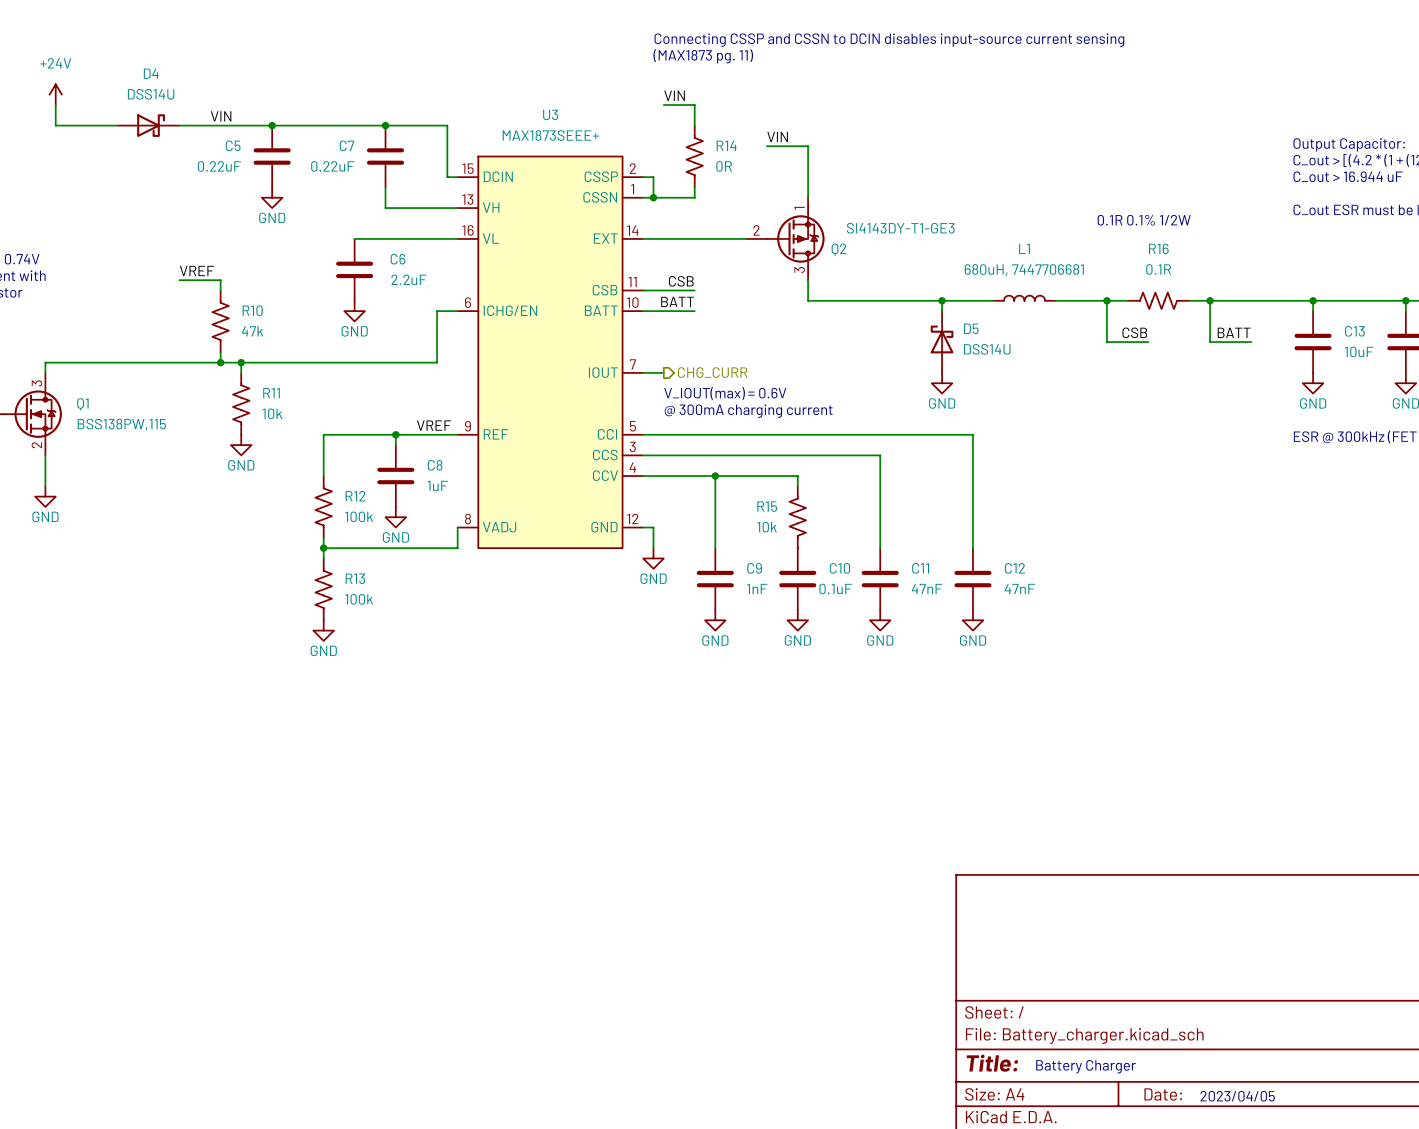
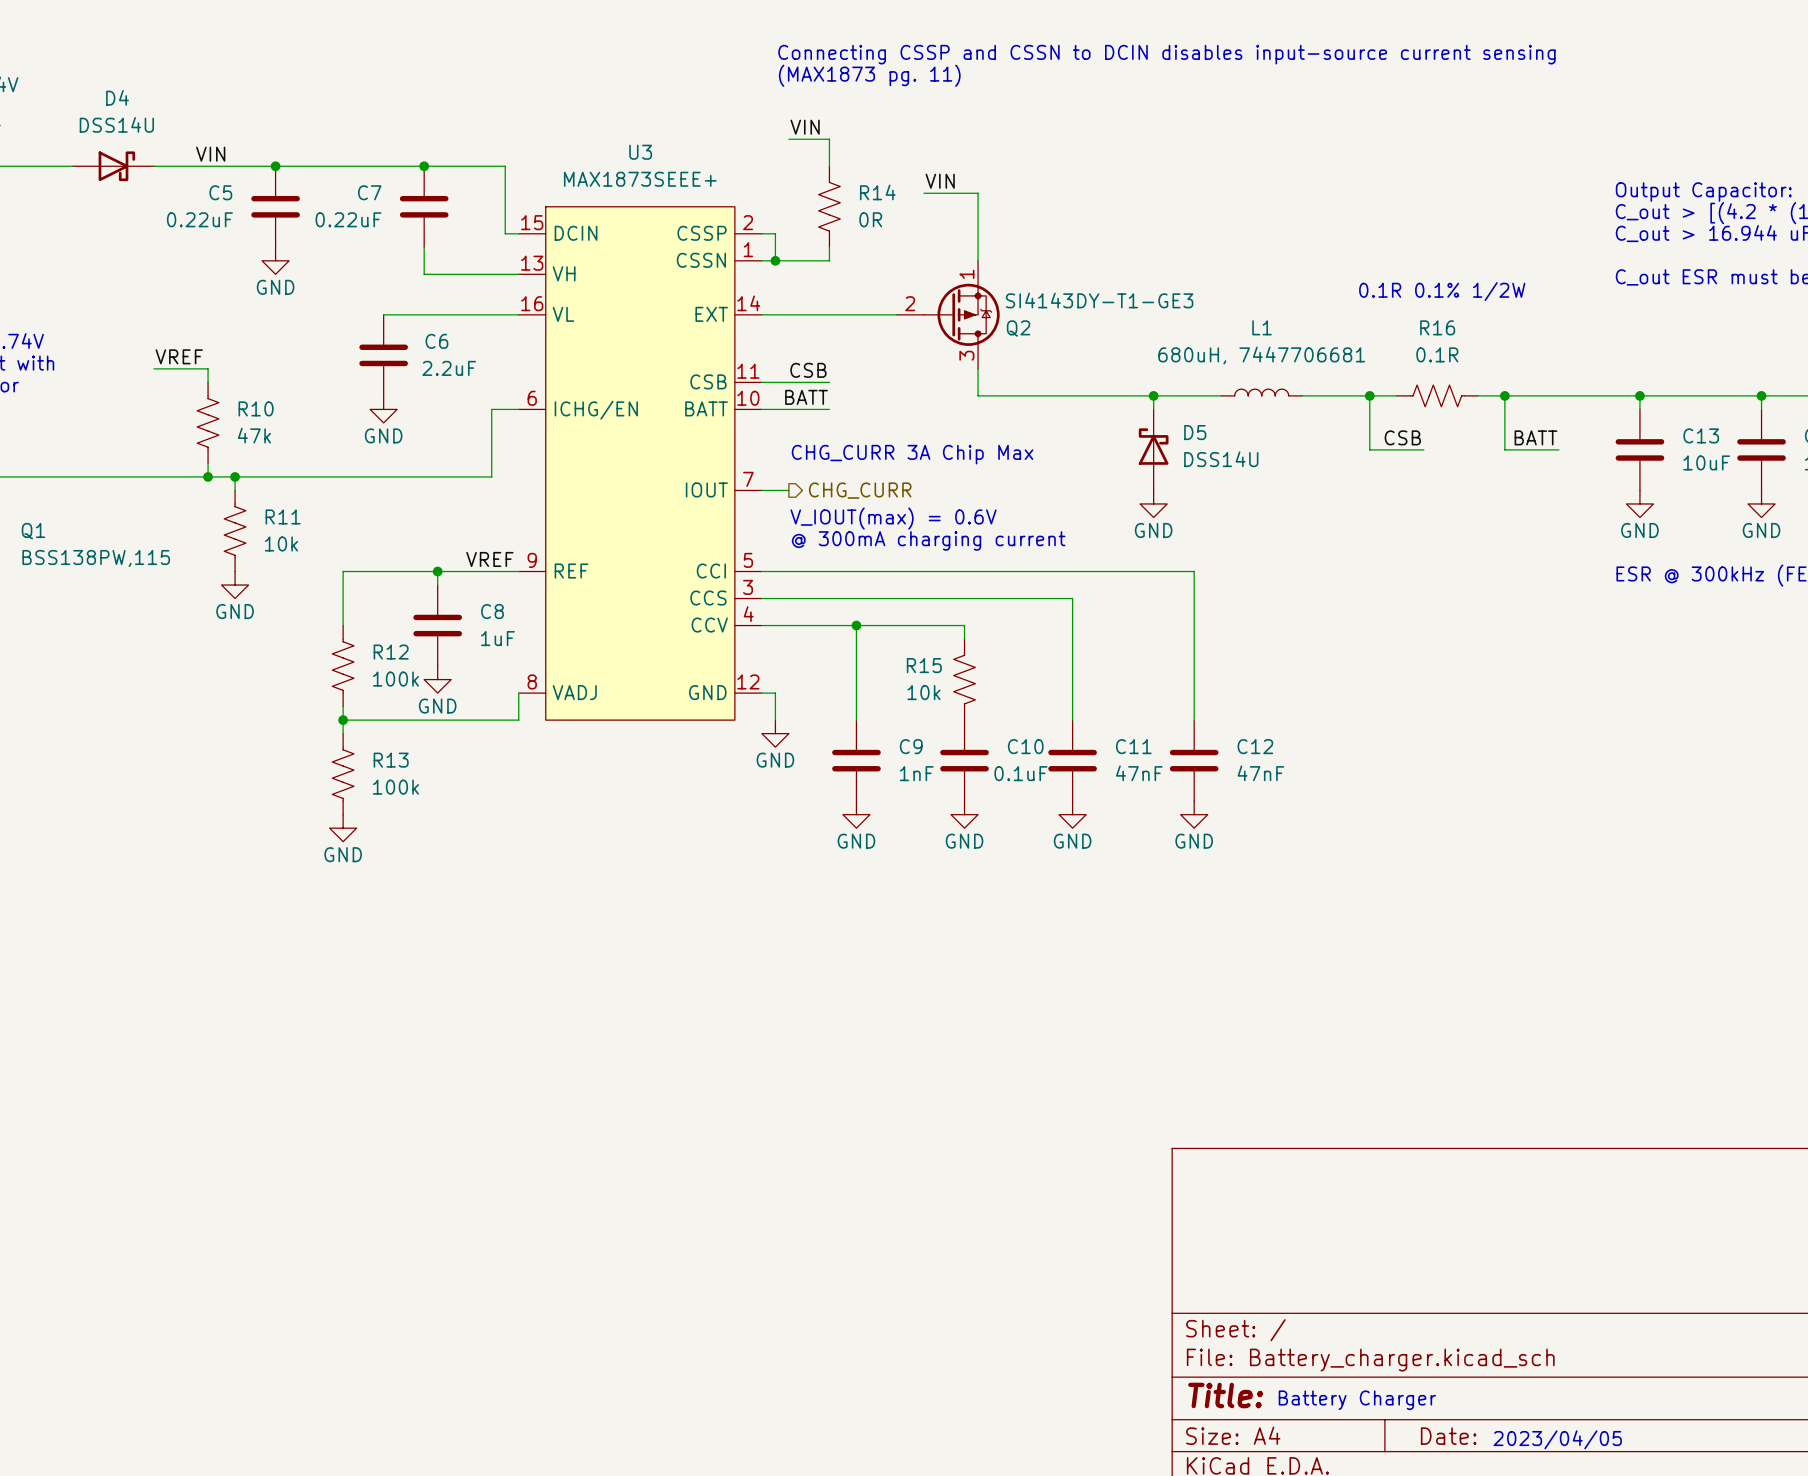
text: none -> CHG_CURR 3A Chip Max (912, 454)

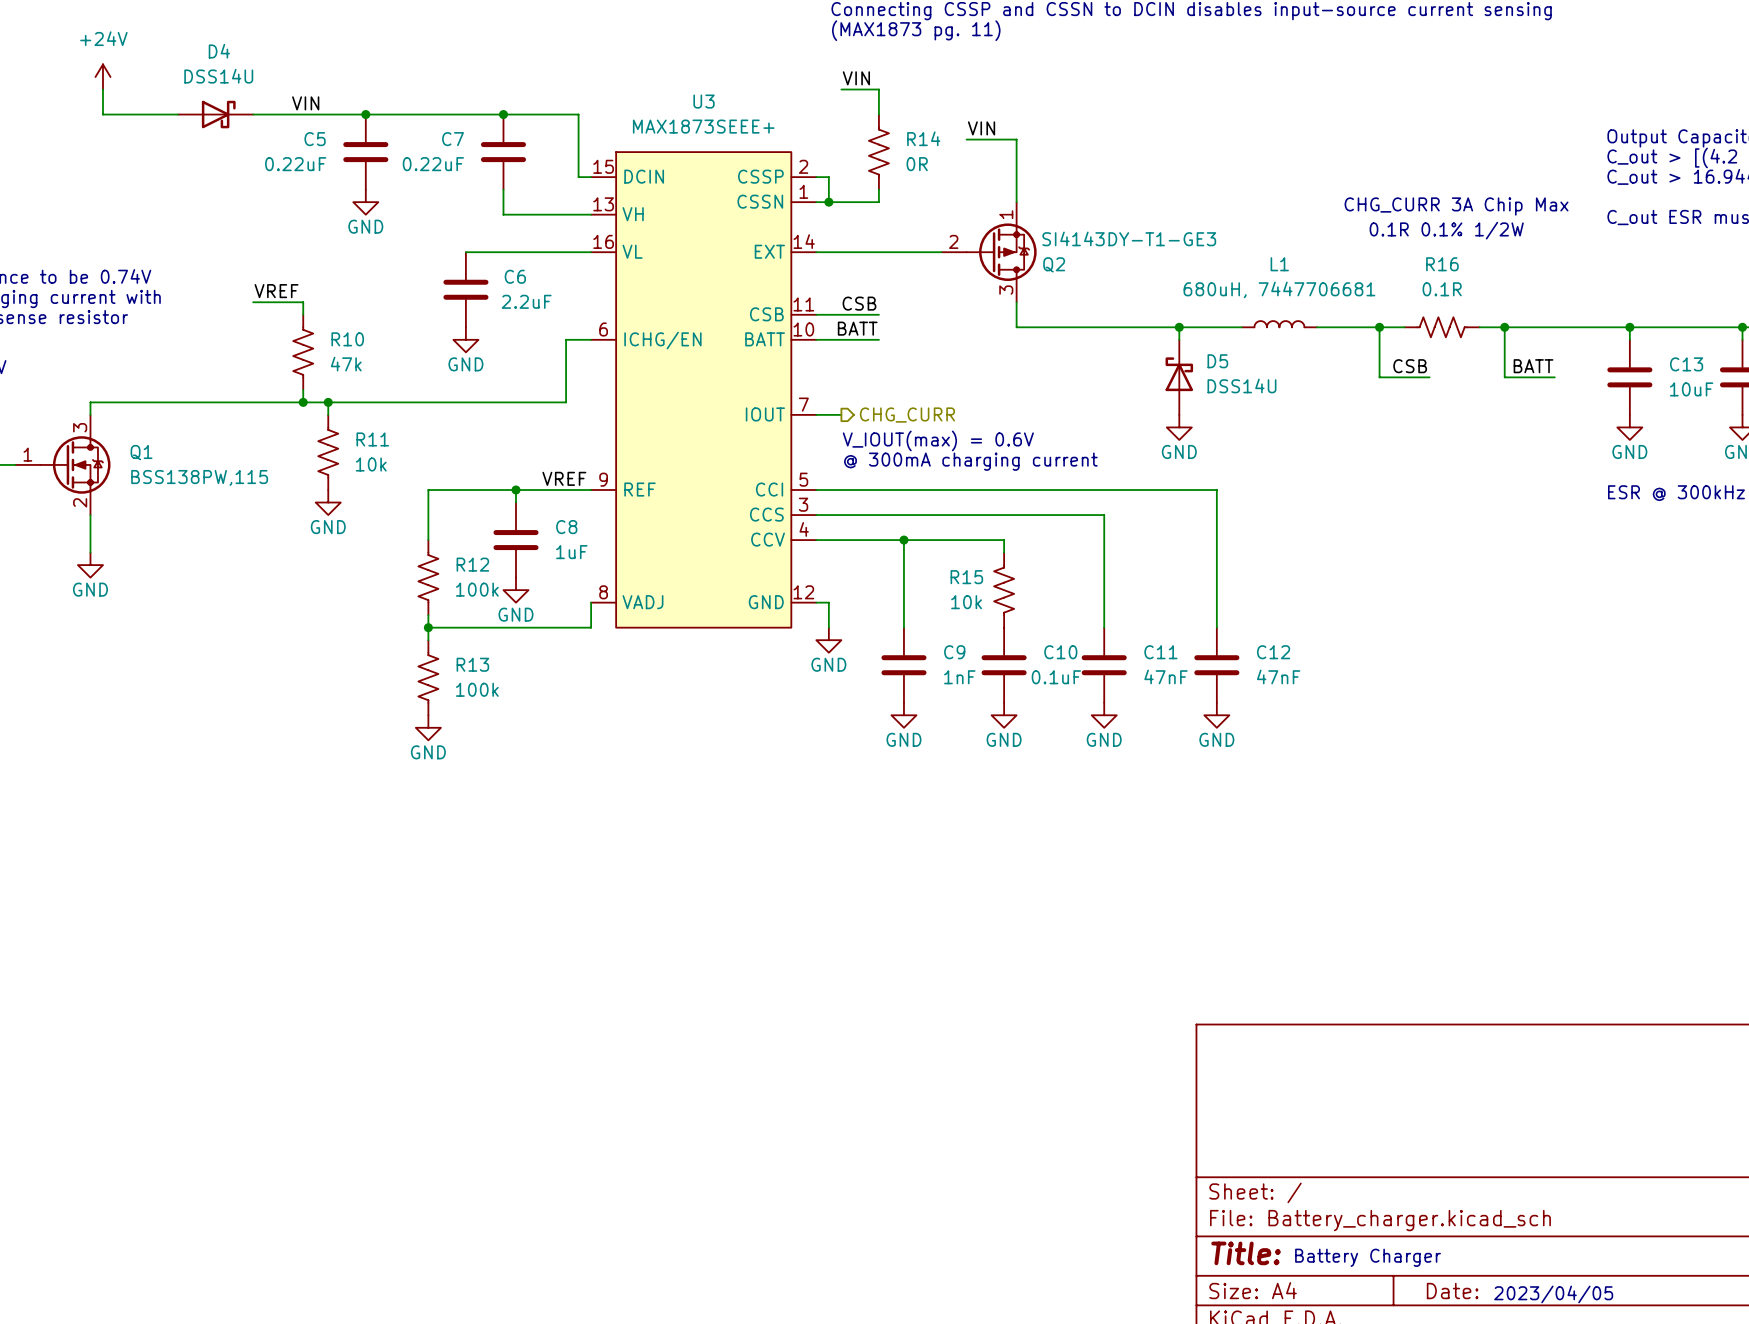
text: none -> CHG_CURR 3A Chip Max (1456, 206)
text: CHG_CURR 3A Chip Max (912, 454) -> none

